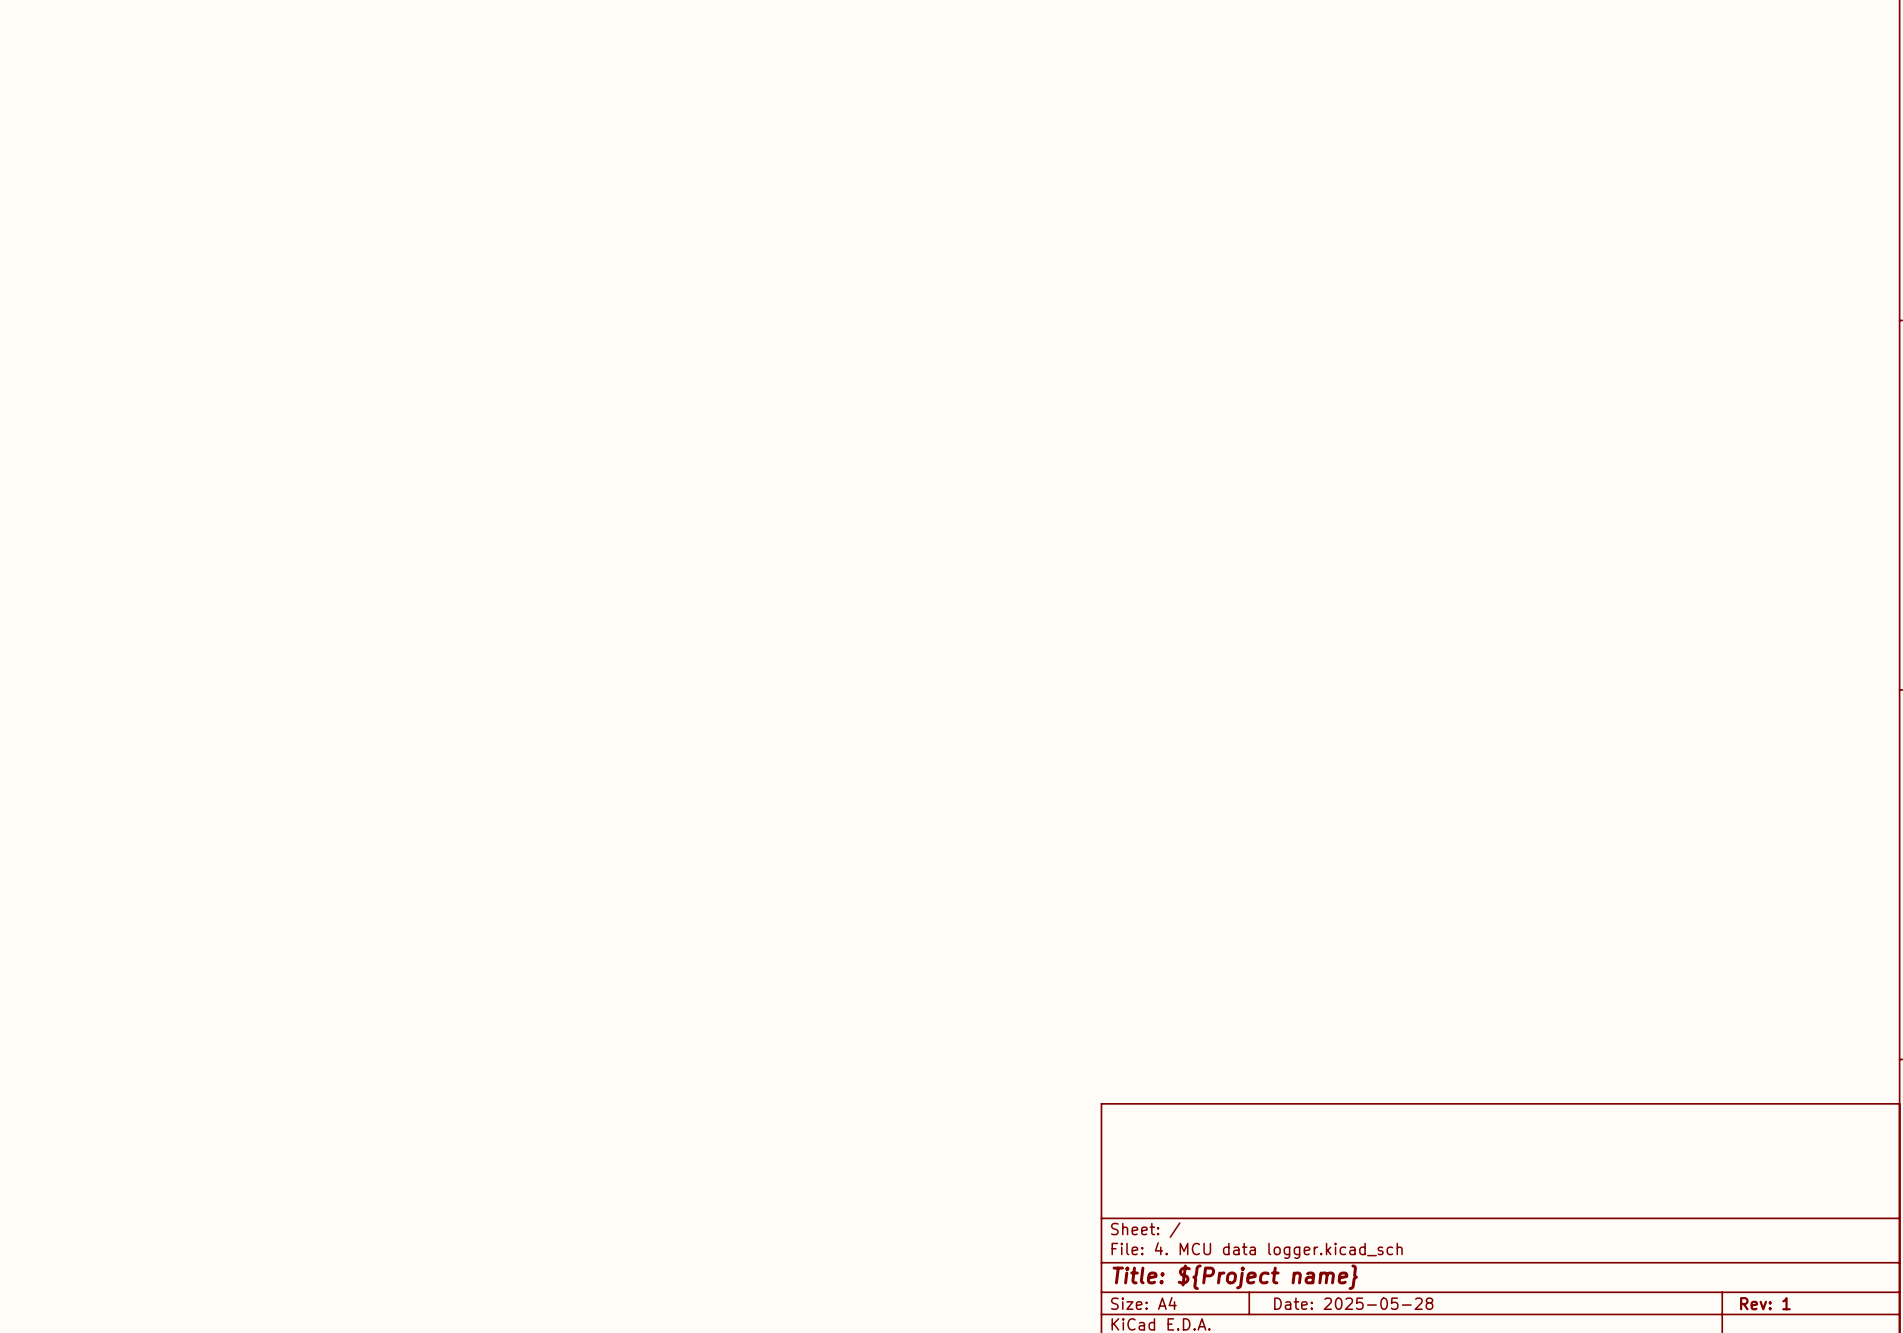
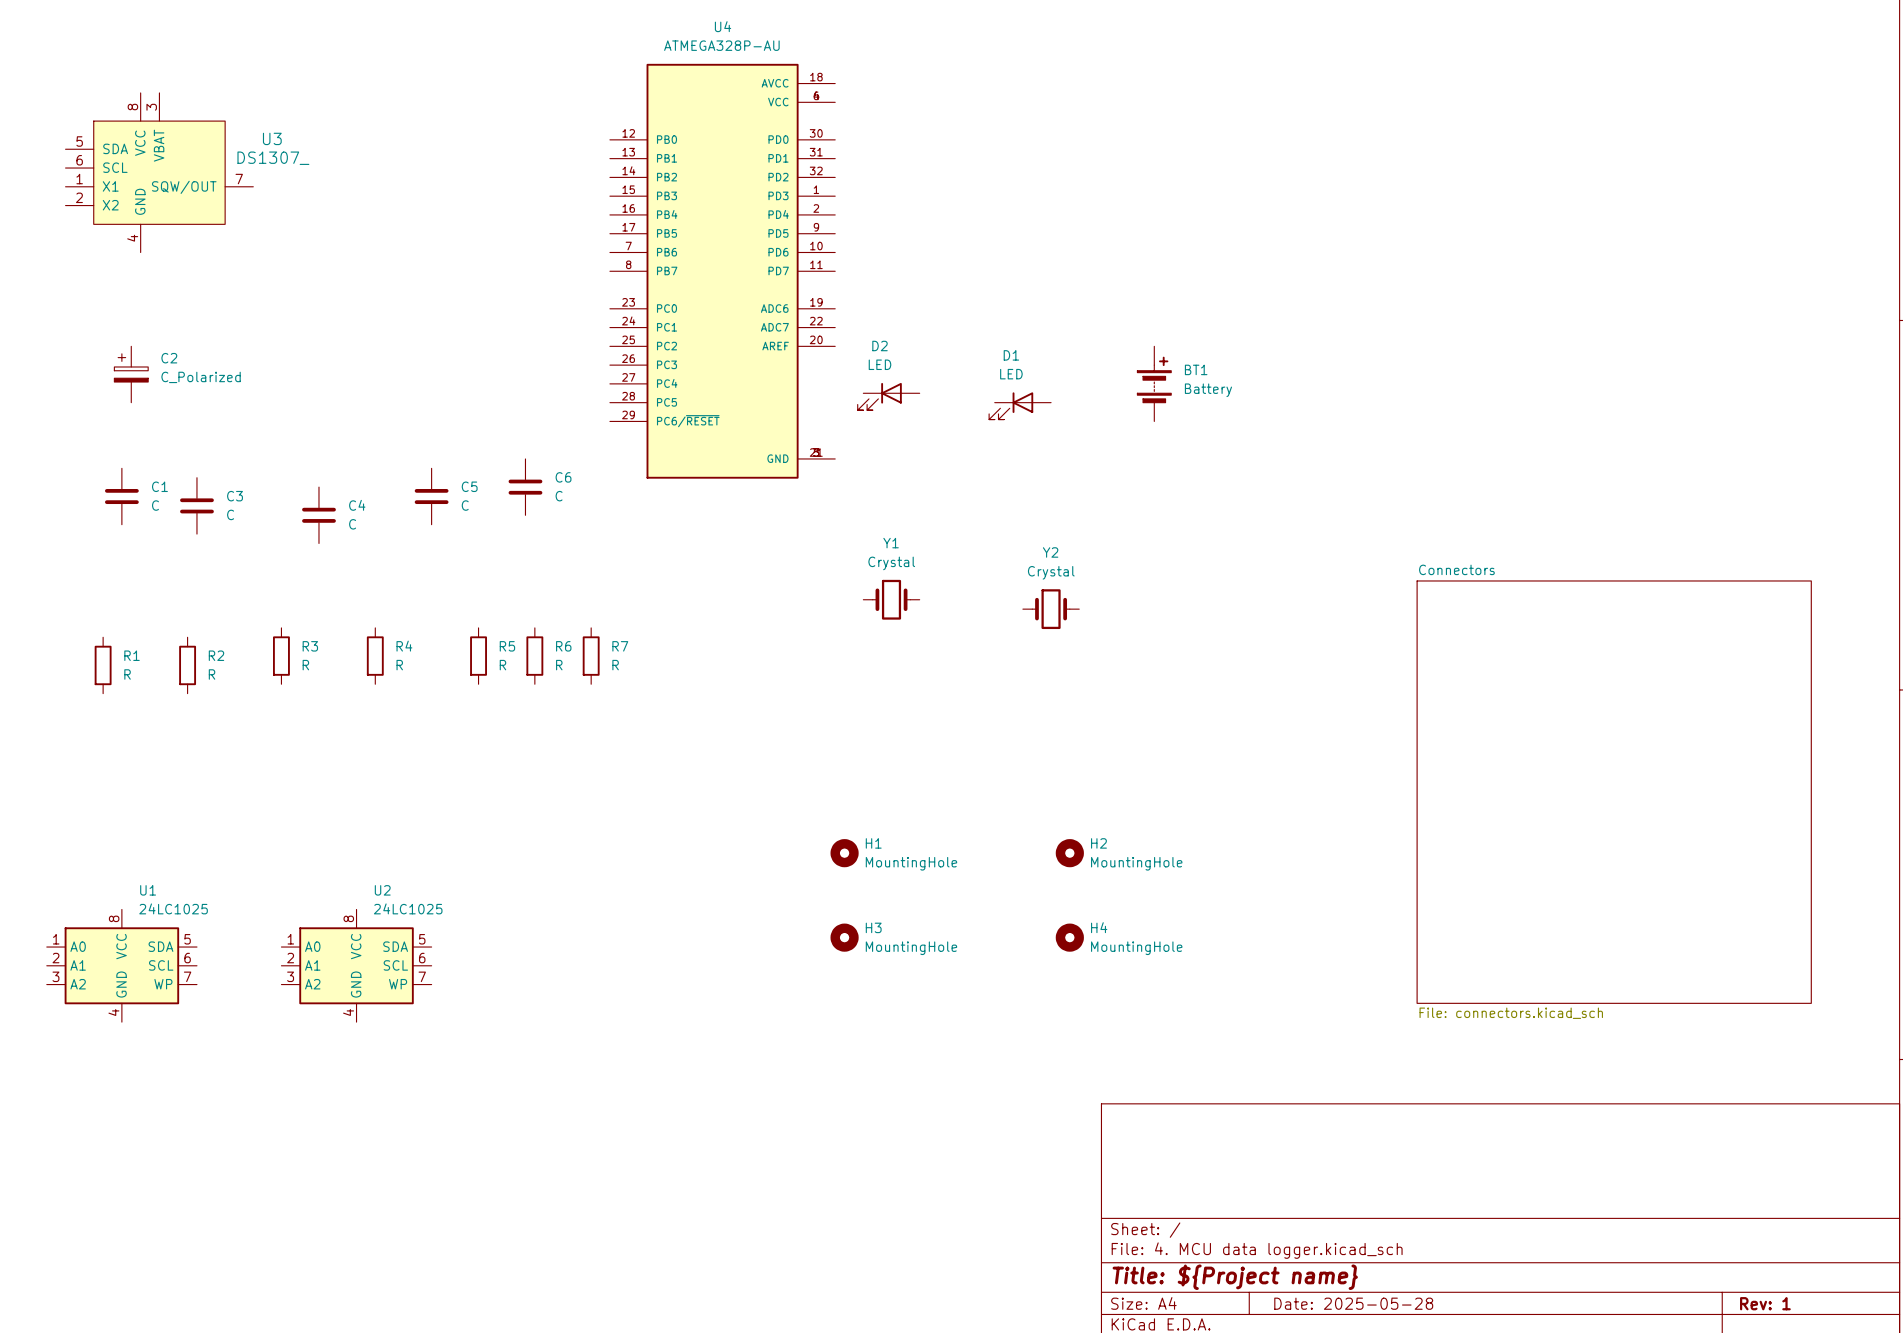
U3: none -> DS1307_ (159, 172)
U4: none -> ATMEGA328P-AU (722, 271)
C2: none -> C_Polarized (131, 374)
BT1: none -> Battery (1154, 383)
D2: none -> LED (888, 396)
D1: none -> LED (1020, 405)
C6: none -> C (525, 487)
C1: none -> C (121, 496)
C5: none -> C (431, 496)
C3: none -> C (196, 505)
C4: none -> C (318, 515)
Y1: none -> Crystal (891, 599)
Y2: none -> Crystal (1051, 609)
R3: none -> R (281, 656)
R4: none -> R (375, 656)
R5: none -> R (478, 656)
R6: none -> R (534, 656)
R7: none -> R (591, 656)
R1: none -> R (103, 665)
R2: none -> R (187, 665)
sheet Connectors: none -> File: connectors.kicad_sch (1614, 792)
H1: none -> MountingHole (844, 853)
H2: none -> MountingHole (1069, 853)
H3: none -> MountingHole (844, 937)
H4: none -> MountingHole (1069, 937)
U1: none -> 24LC1025 (121, 965)
U2: none -> 24LC1025 (356, 965)

